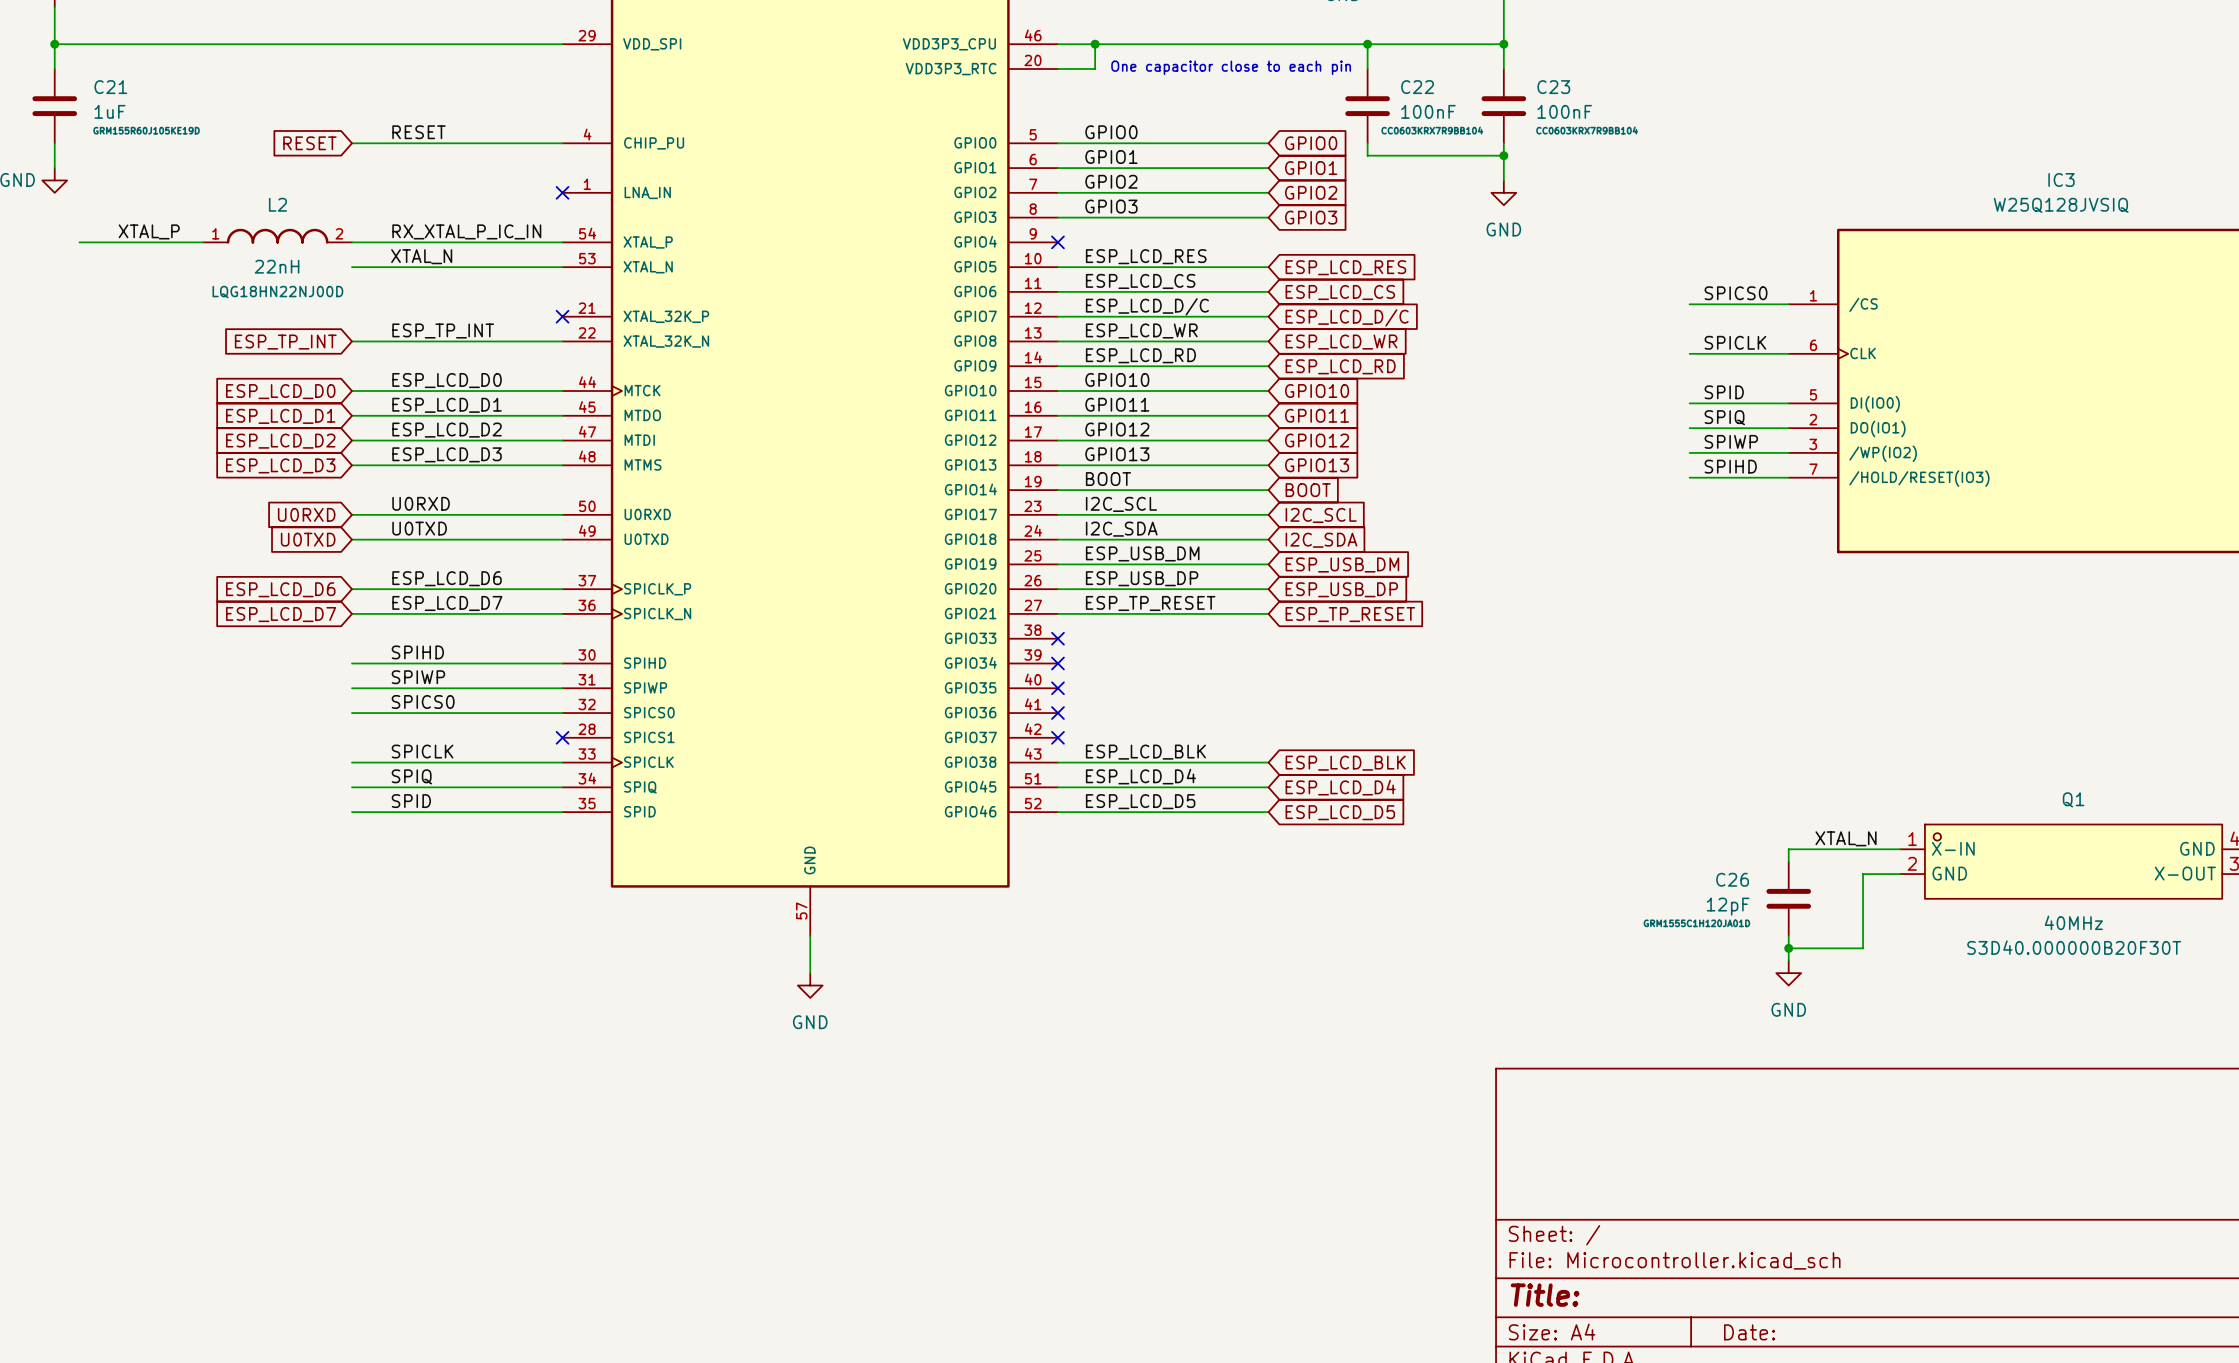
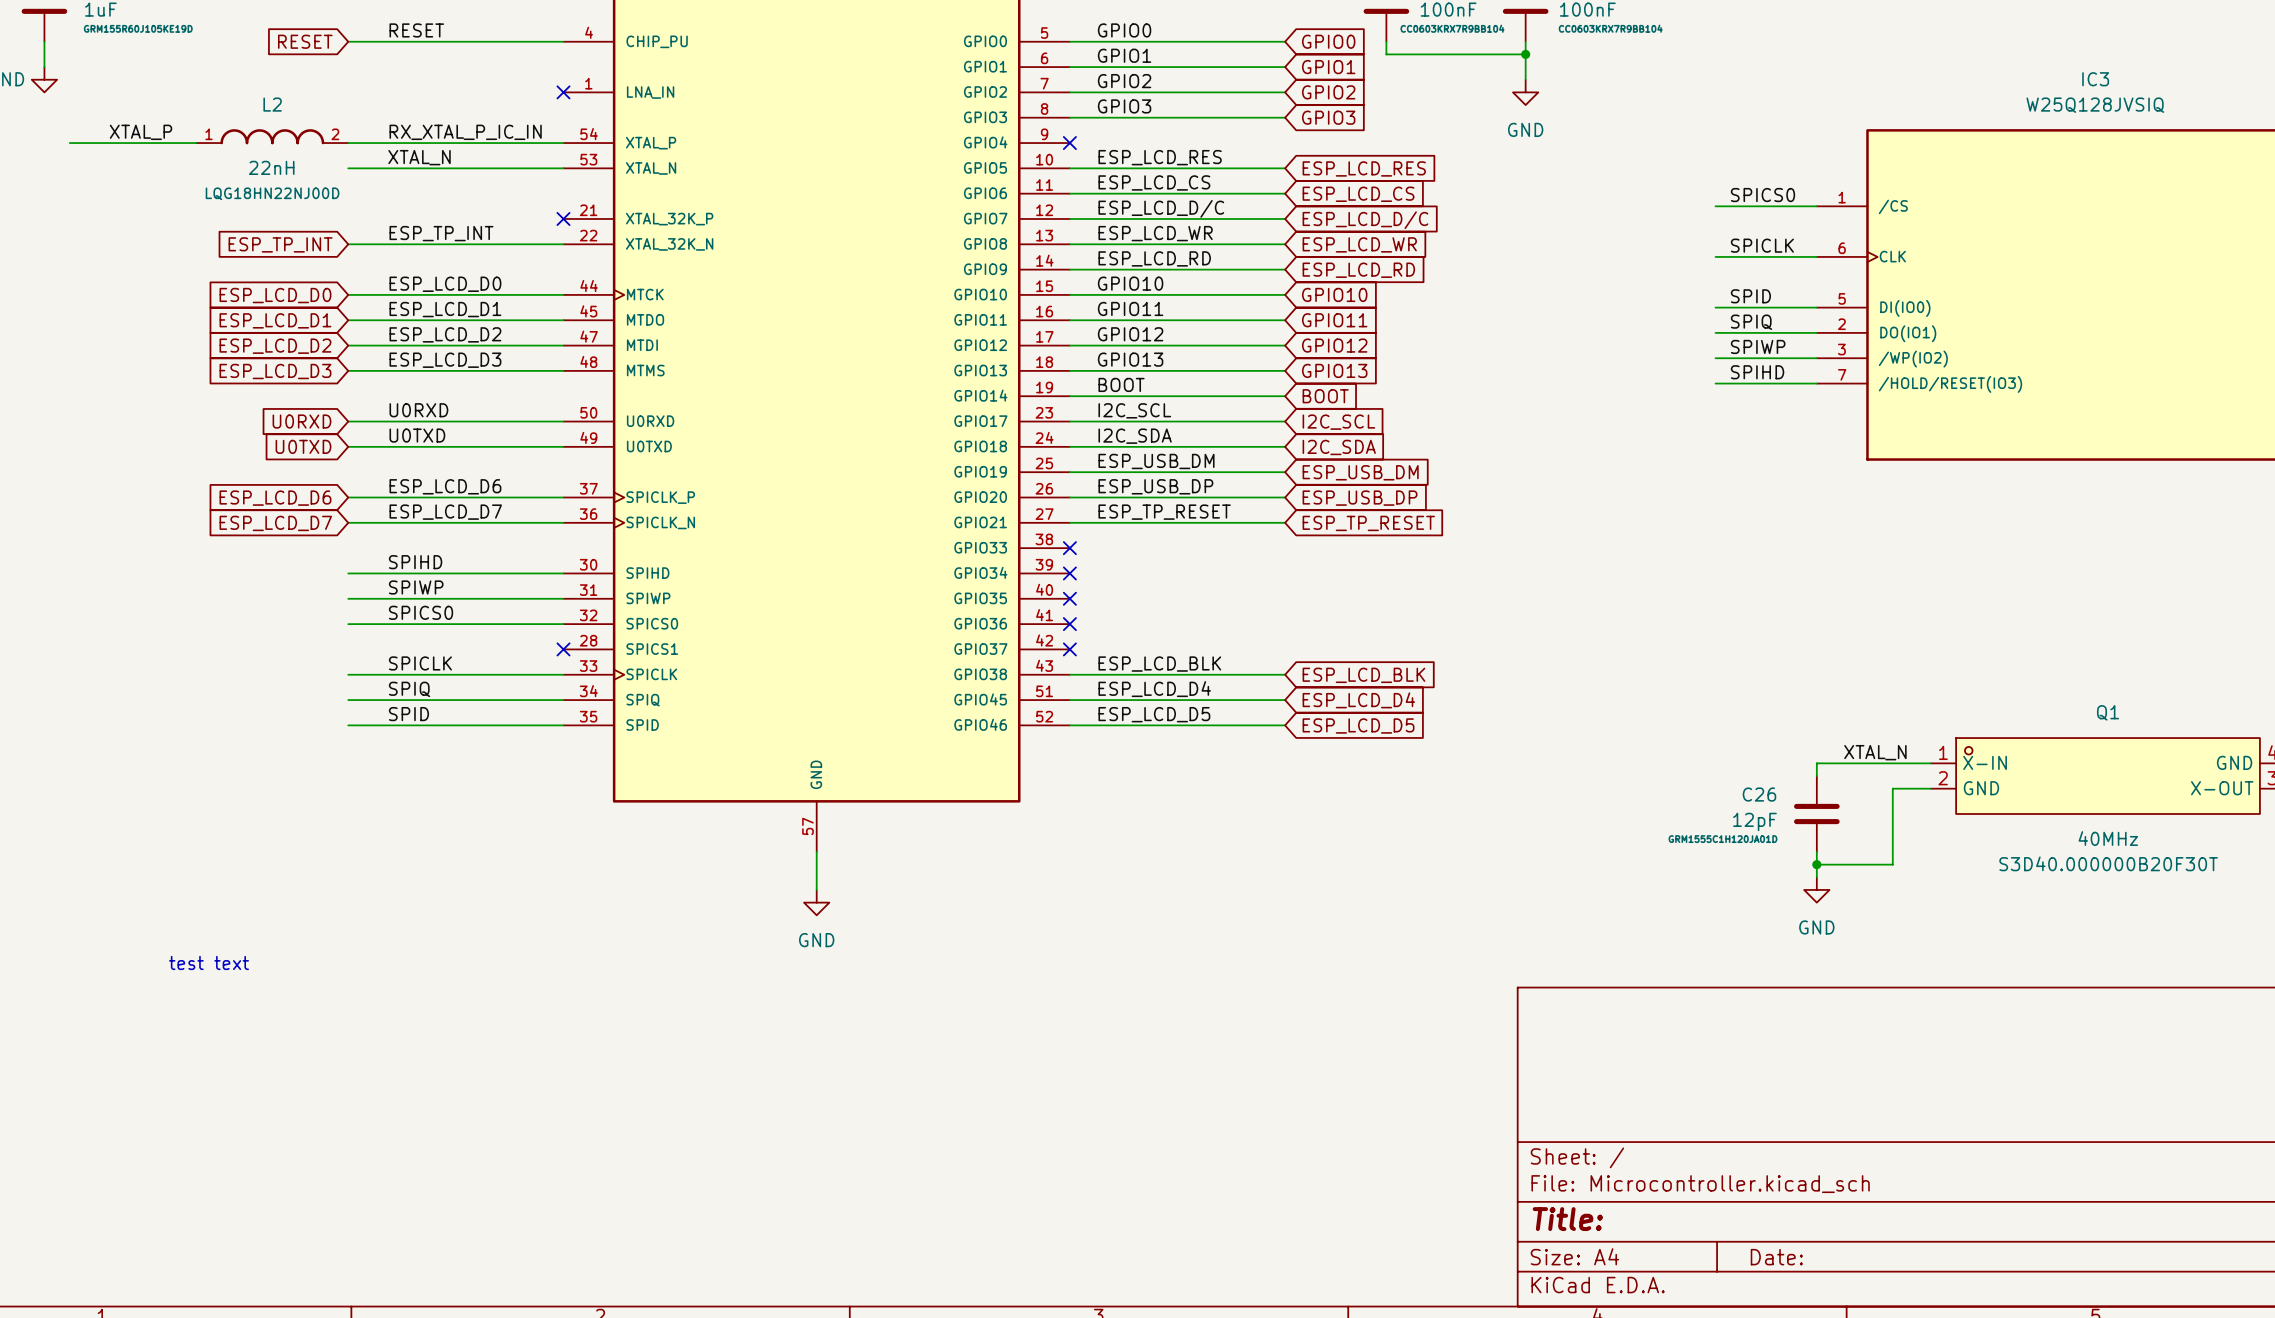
text: none -> test text (209, 962)

